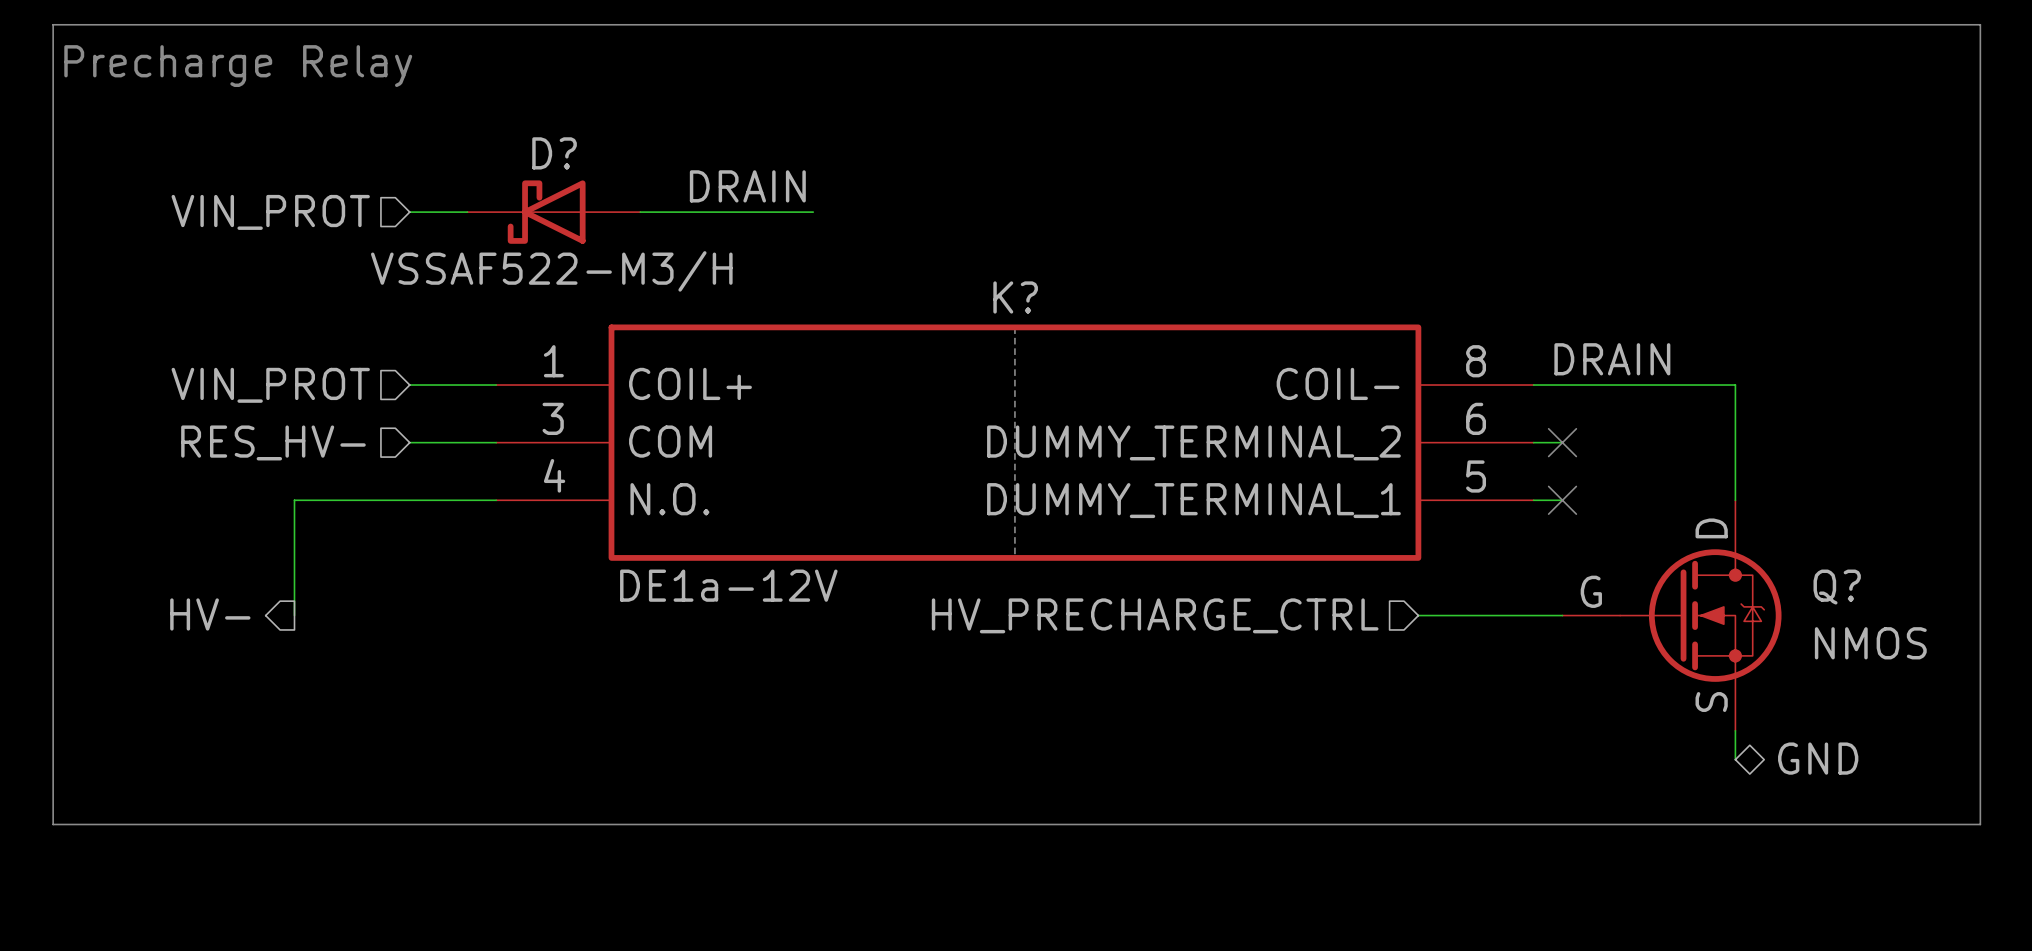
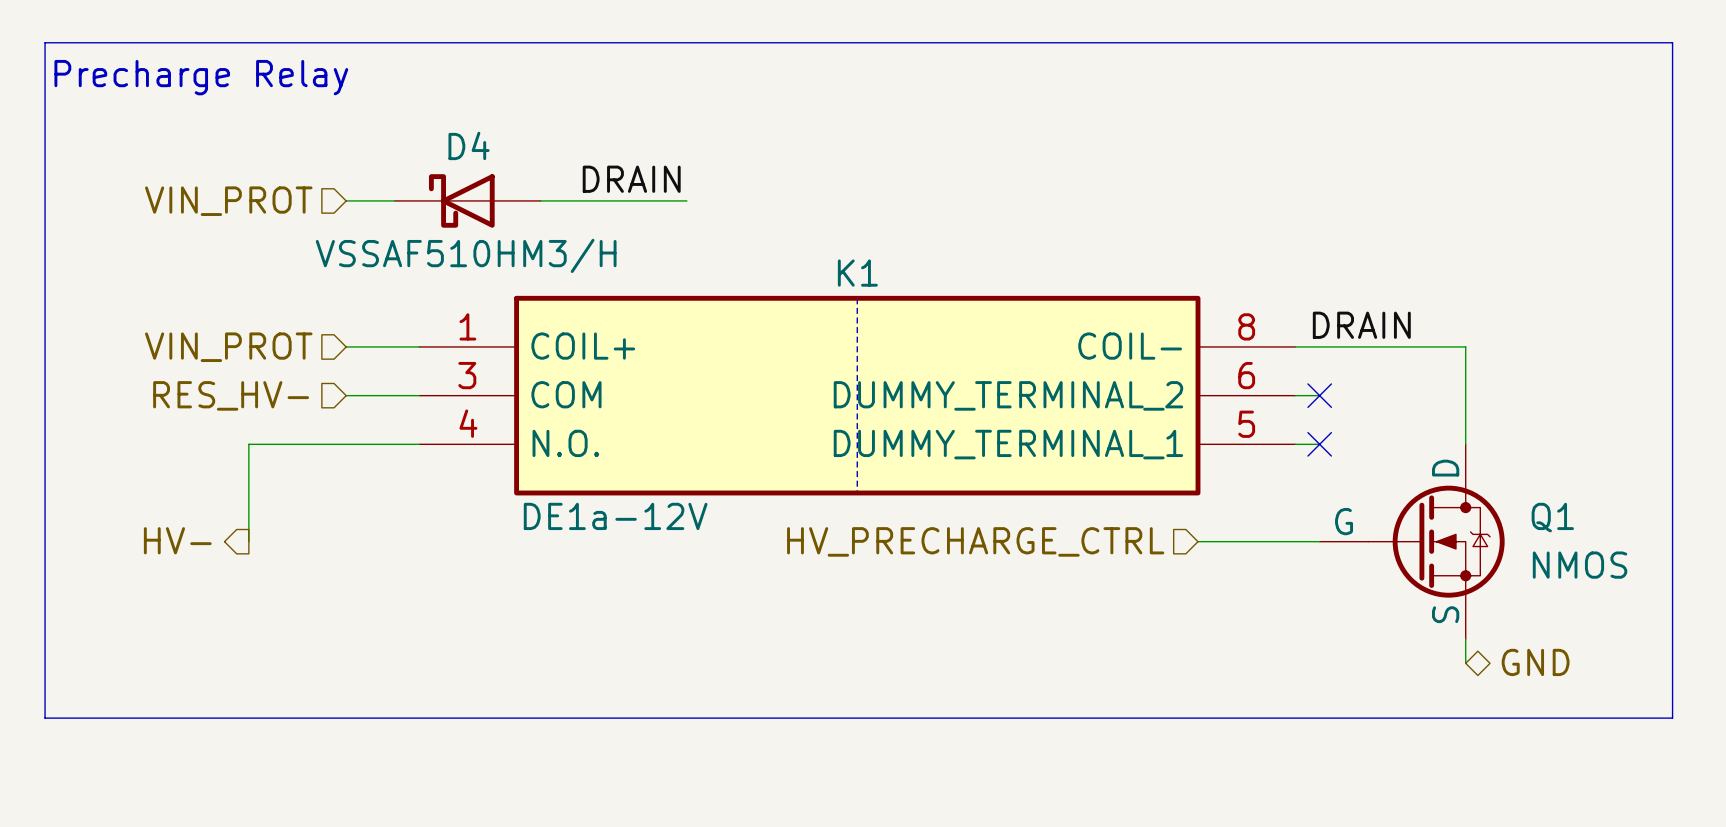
D?: VSSAF522-M3/H (553, 212) -> none
D4: none -> VSSAF510HM3/H (467, 200)
K? name: K? (1015, 297) -> K1 (857, 273)
Q? name: Q? (1837, 587) -> Q1 (1552, 517)

